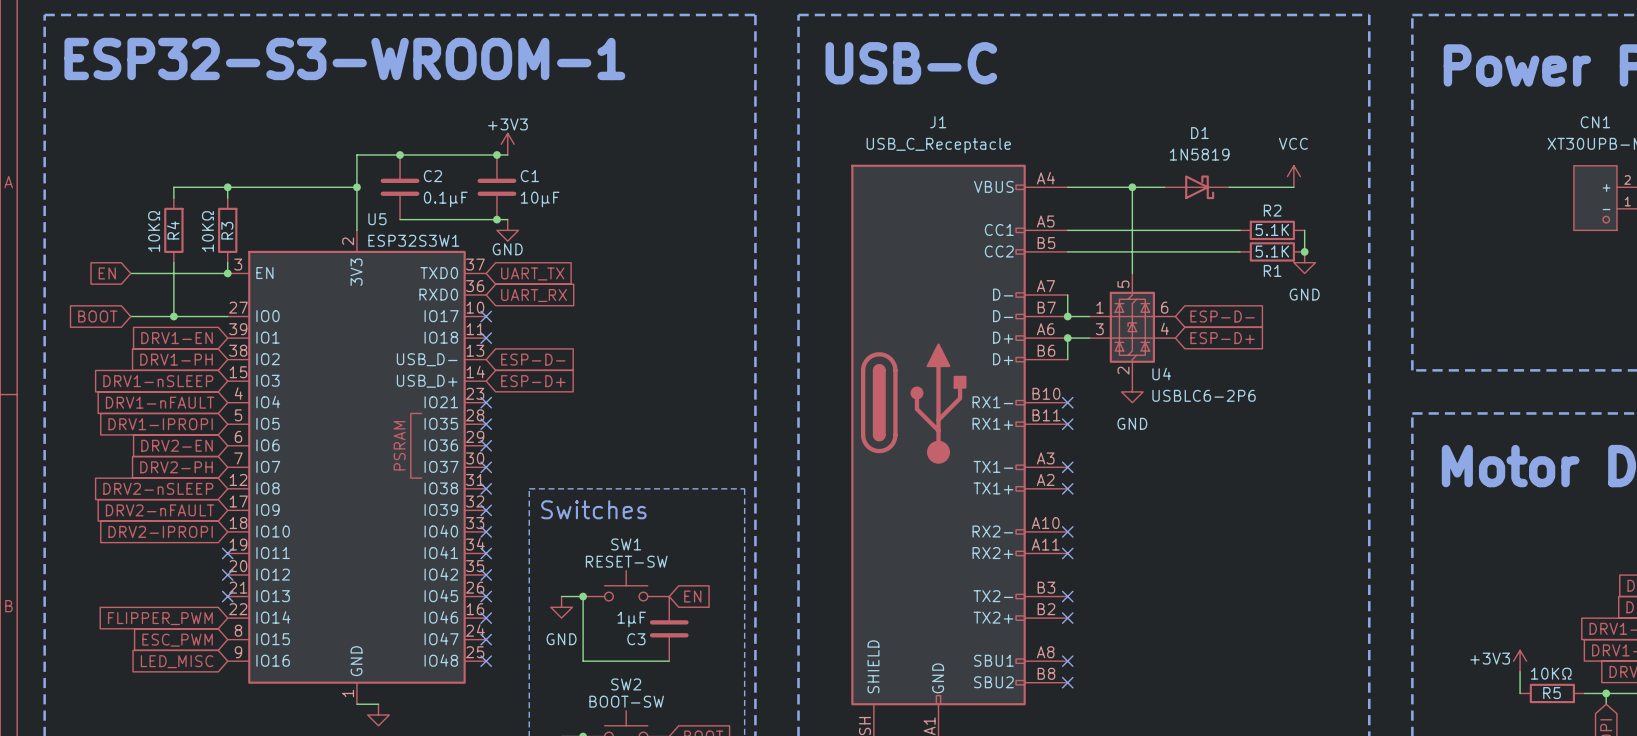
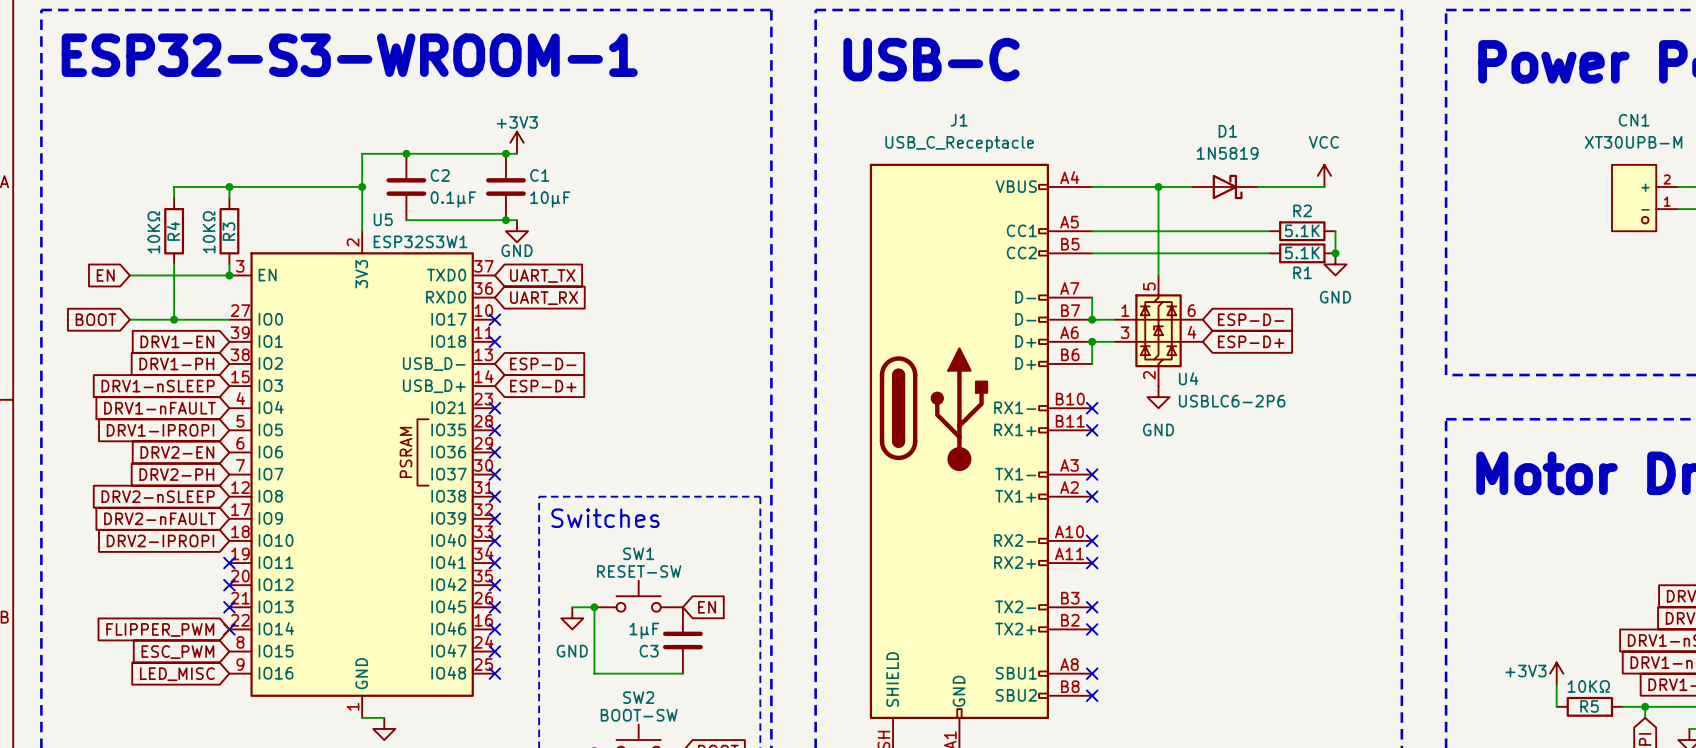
no-connect mark: none -> (229, 629)

